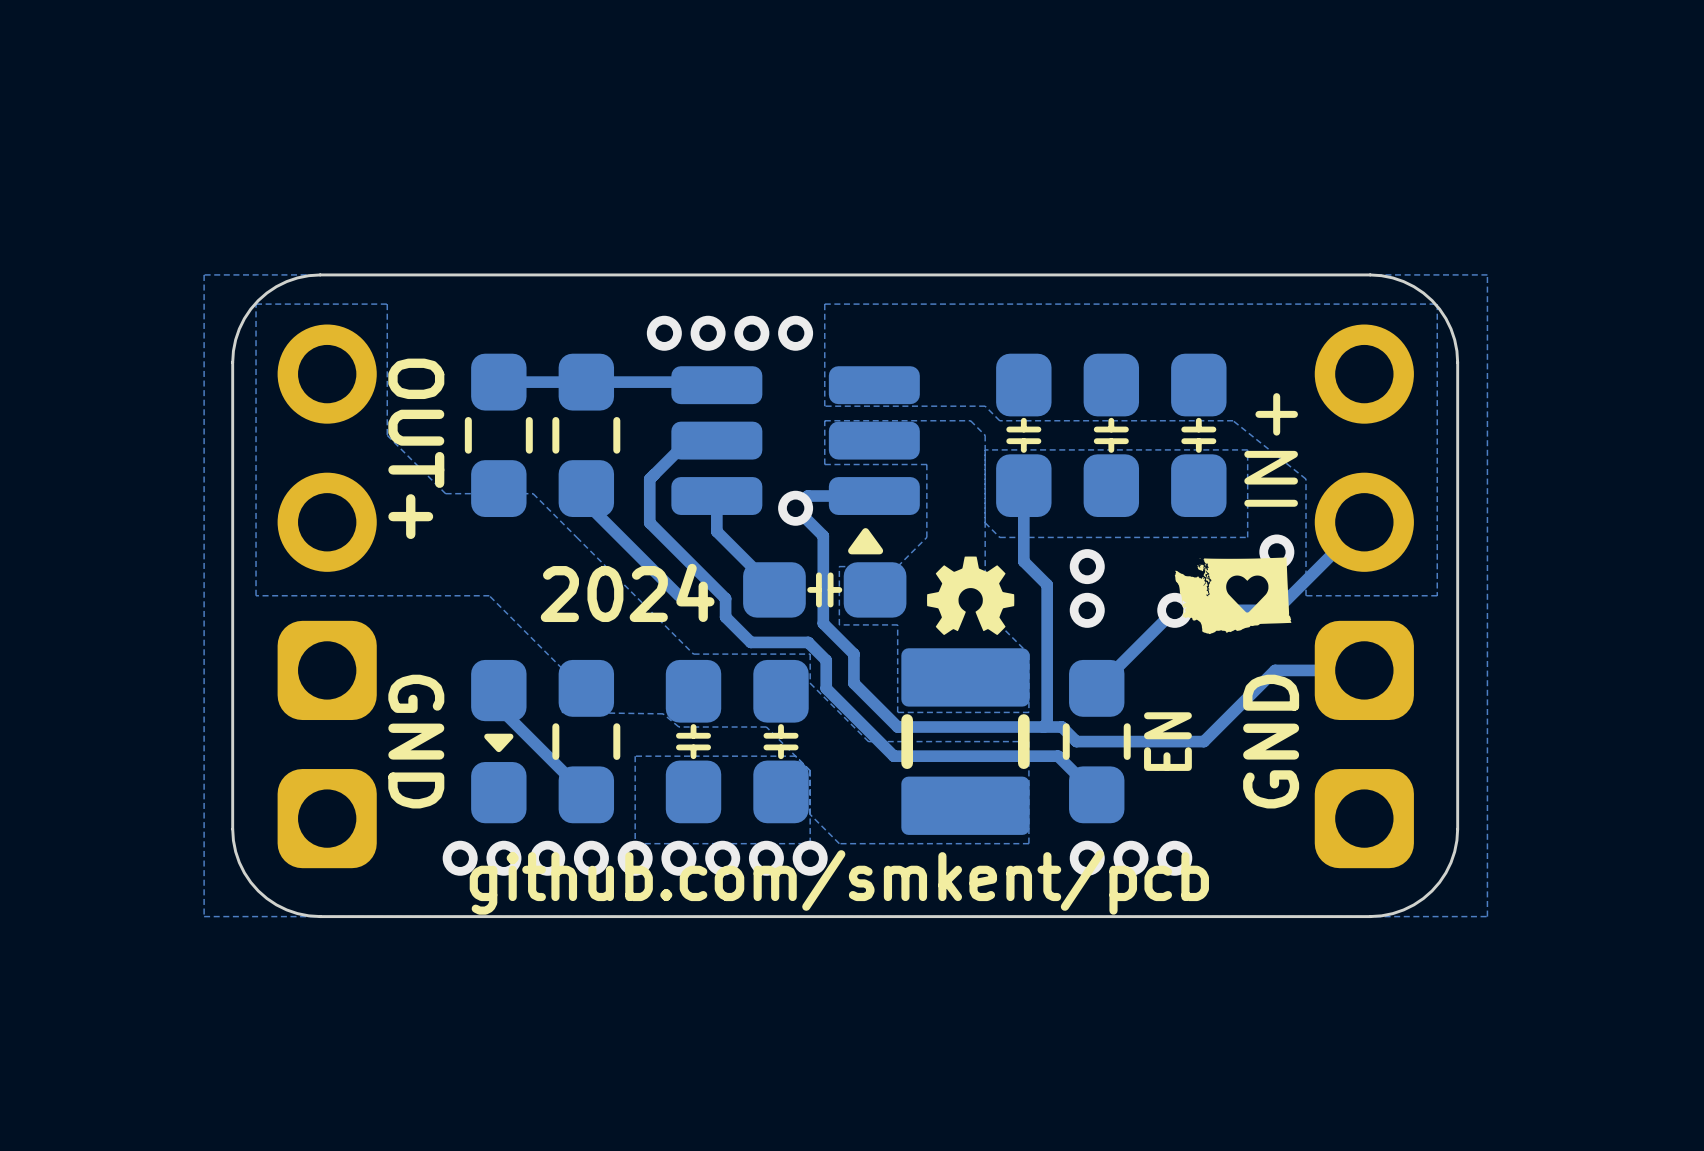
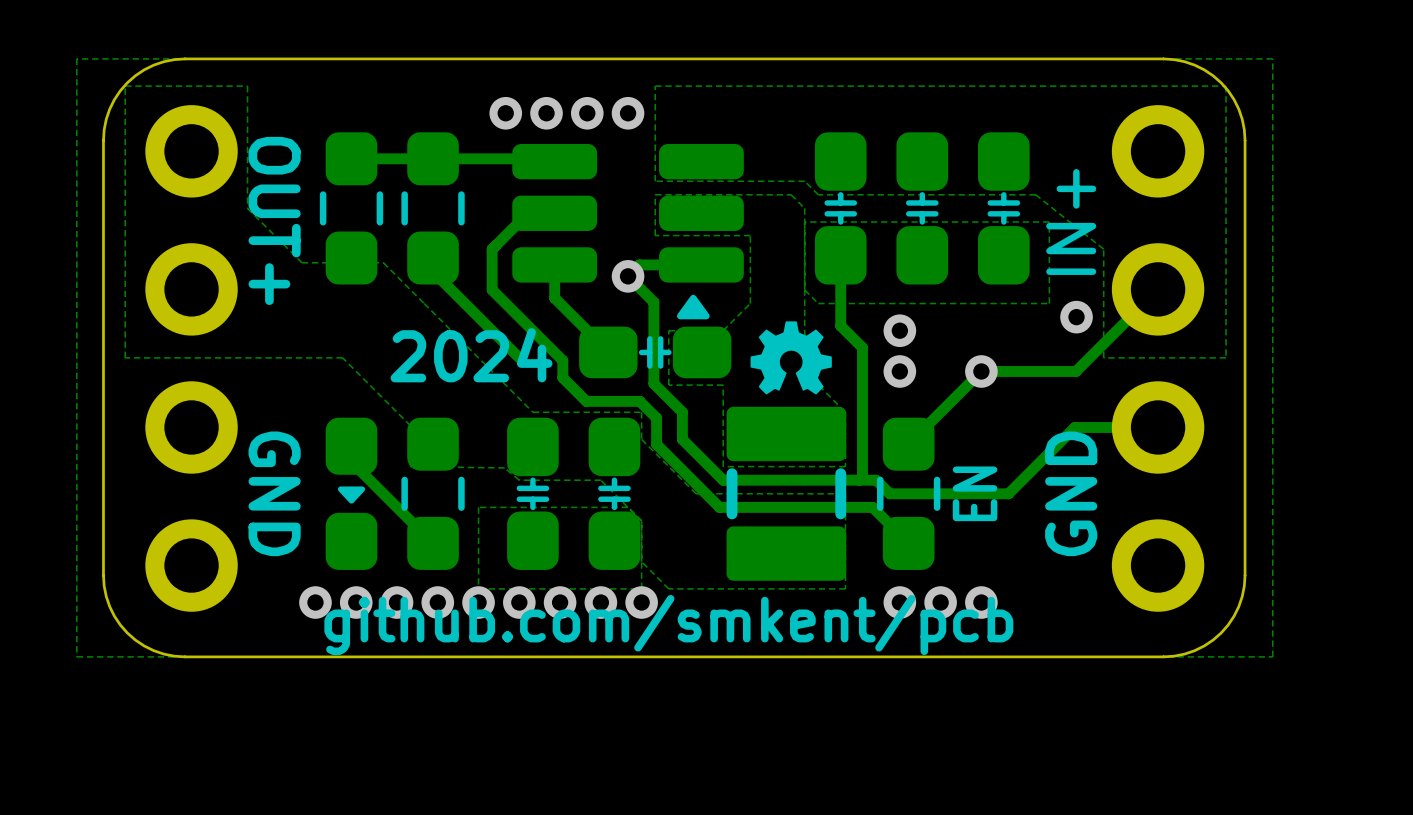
part footprint: [277, 324, 377, 869] -> [145, 105, 238, 612]
part footprint: [1314, 324, 1414, 869] -> [1111, 105, 1205, 612]
drawing: [1174, 557, 1292, 635] -> none

